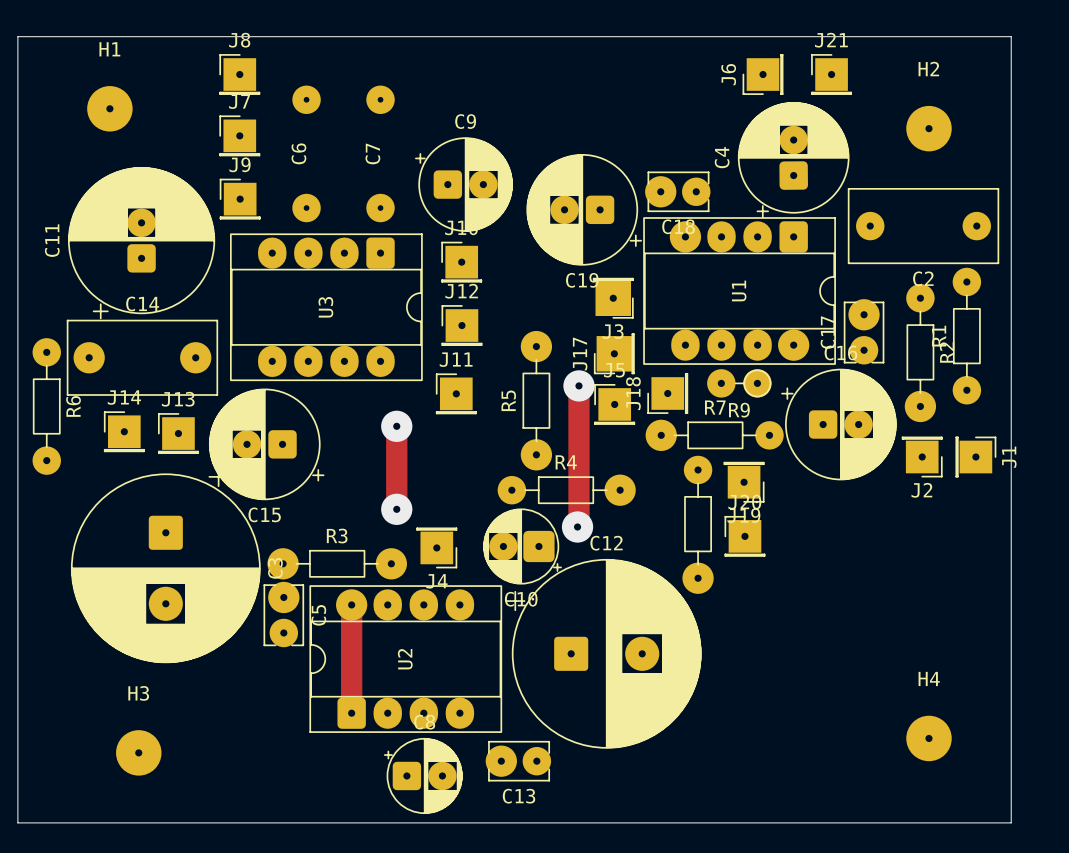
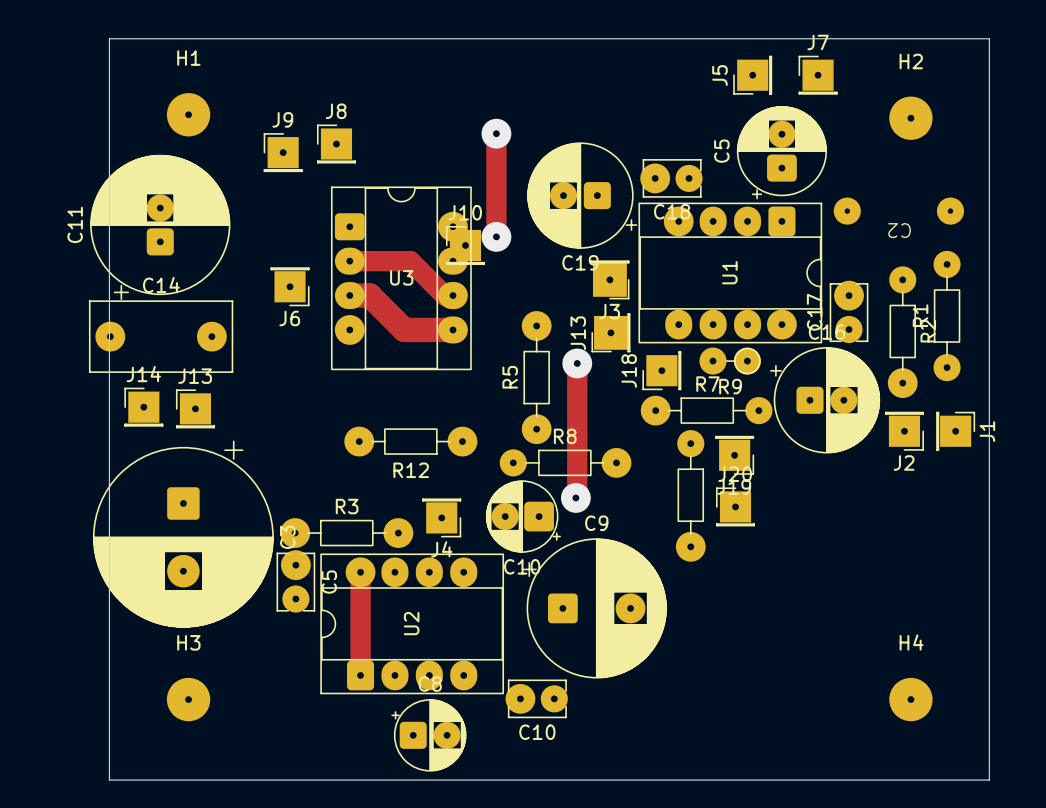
board edge: (1011, 45) (1011, 36) (17, 36) (17, 822) (88, 822) -> (989, 38) (109, 38) (109, 780)
J8 position: (239, 74) -> (336, 144)
J6 rotation: 0° (763, 74) -> 90° counterclockwise (290, 286)
J6 position: (763, 74) -> (290, 286)
J21: (831, 74) -> none
H1 position: (109, 108) -> (188, 114)
J7 position: (239, 135) -> (818, 75)
C9 footprint: [415, 137, 513, 232] -> [521, 538, 667, 679]
track: none -> (496, 133) (496, 236)
via: none -> (496, 133)
C6: (306, 153) -> none
C7: (380, 153) -> none
C4: (793, 159) -> none
C5: none -> (781, 152)
C2 footprint: [847, 188, 1000, 265] -> [833, 197, 965, 225]
J9 position: (240, 199) -> (283, 152)
U3 footprint: [230, 233, 423, 382] -> [330, 186, 472, 371]
via: none -> (496, 236)
track: none -> (349, 261) (410, 261) (444, 295) (452, 295)
C2 name position: C2 (923, 278) -> C2 (899, 230)
track: none -> (349, 295) (369, 295) (404, 329) (452, 329)
J12: (461, 325) -> none
J17 name: J17 (580, 354) -> J13 (578, 333)
J11: (456, 393) -> none
J5 rotation: 0° (614, 404) -> 90° counterclockwise (752, 75)
J5 position: (614, 404) -> (752, 75)
R6: (46, 406) -> none
track: (396, 426) (396, 509) -> none
via: (396, 426) -> none
C15: (266, 444) -> none
R4 name: R4 (566, 462) -> R8 (565, 436)
R12: none -> (410, 441)
via: (396, 509) -> none
C12: (603, 653) -> none
C10: none -> (536, 698)
H3 position: (138, 752) -> (188, 699)
C13: (518, 761) -> none

